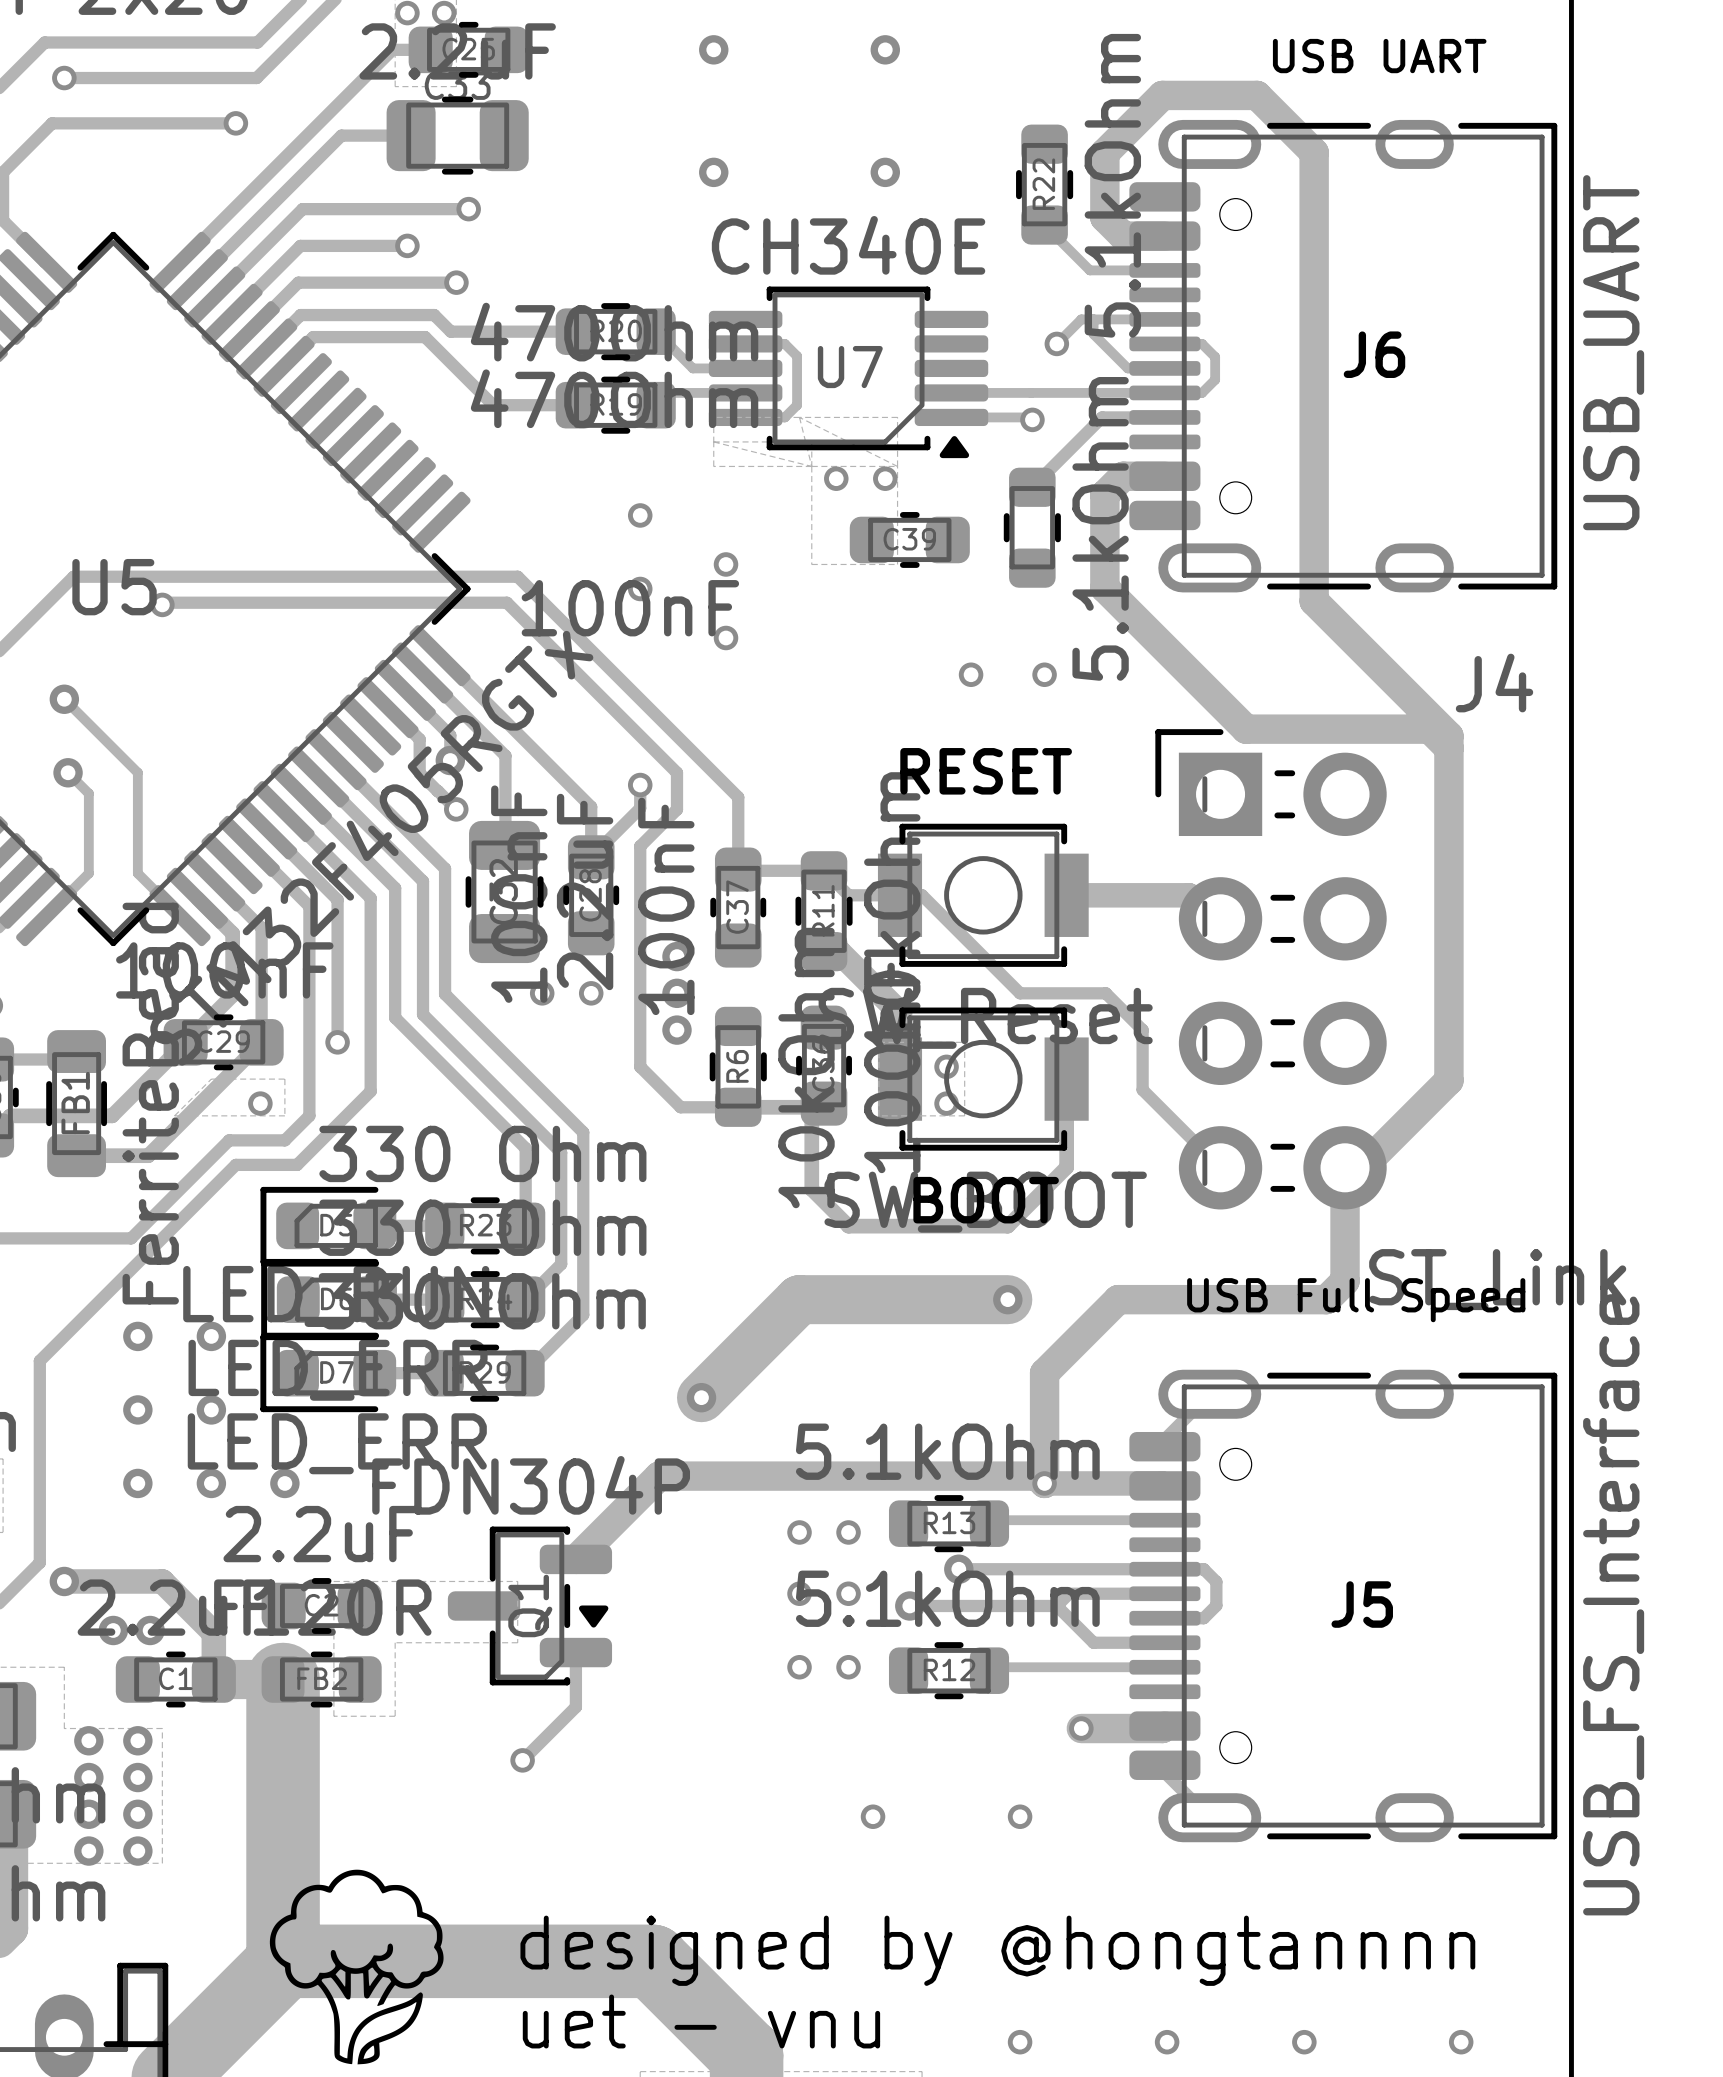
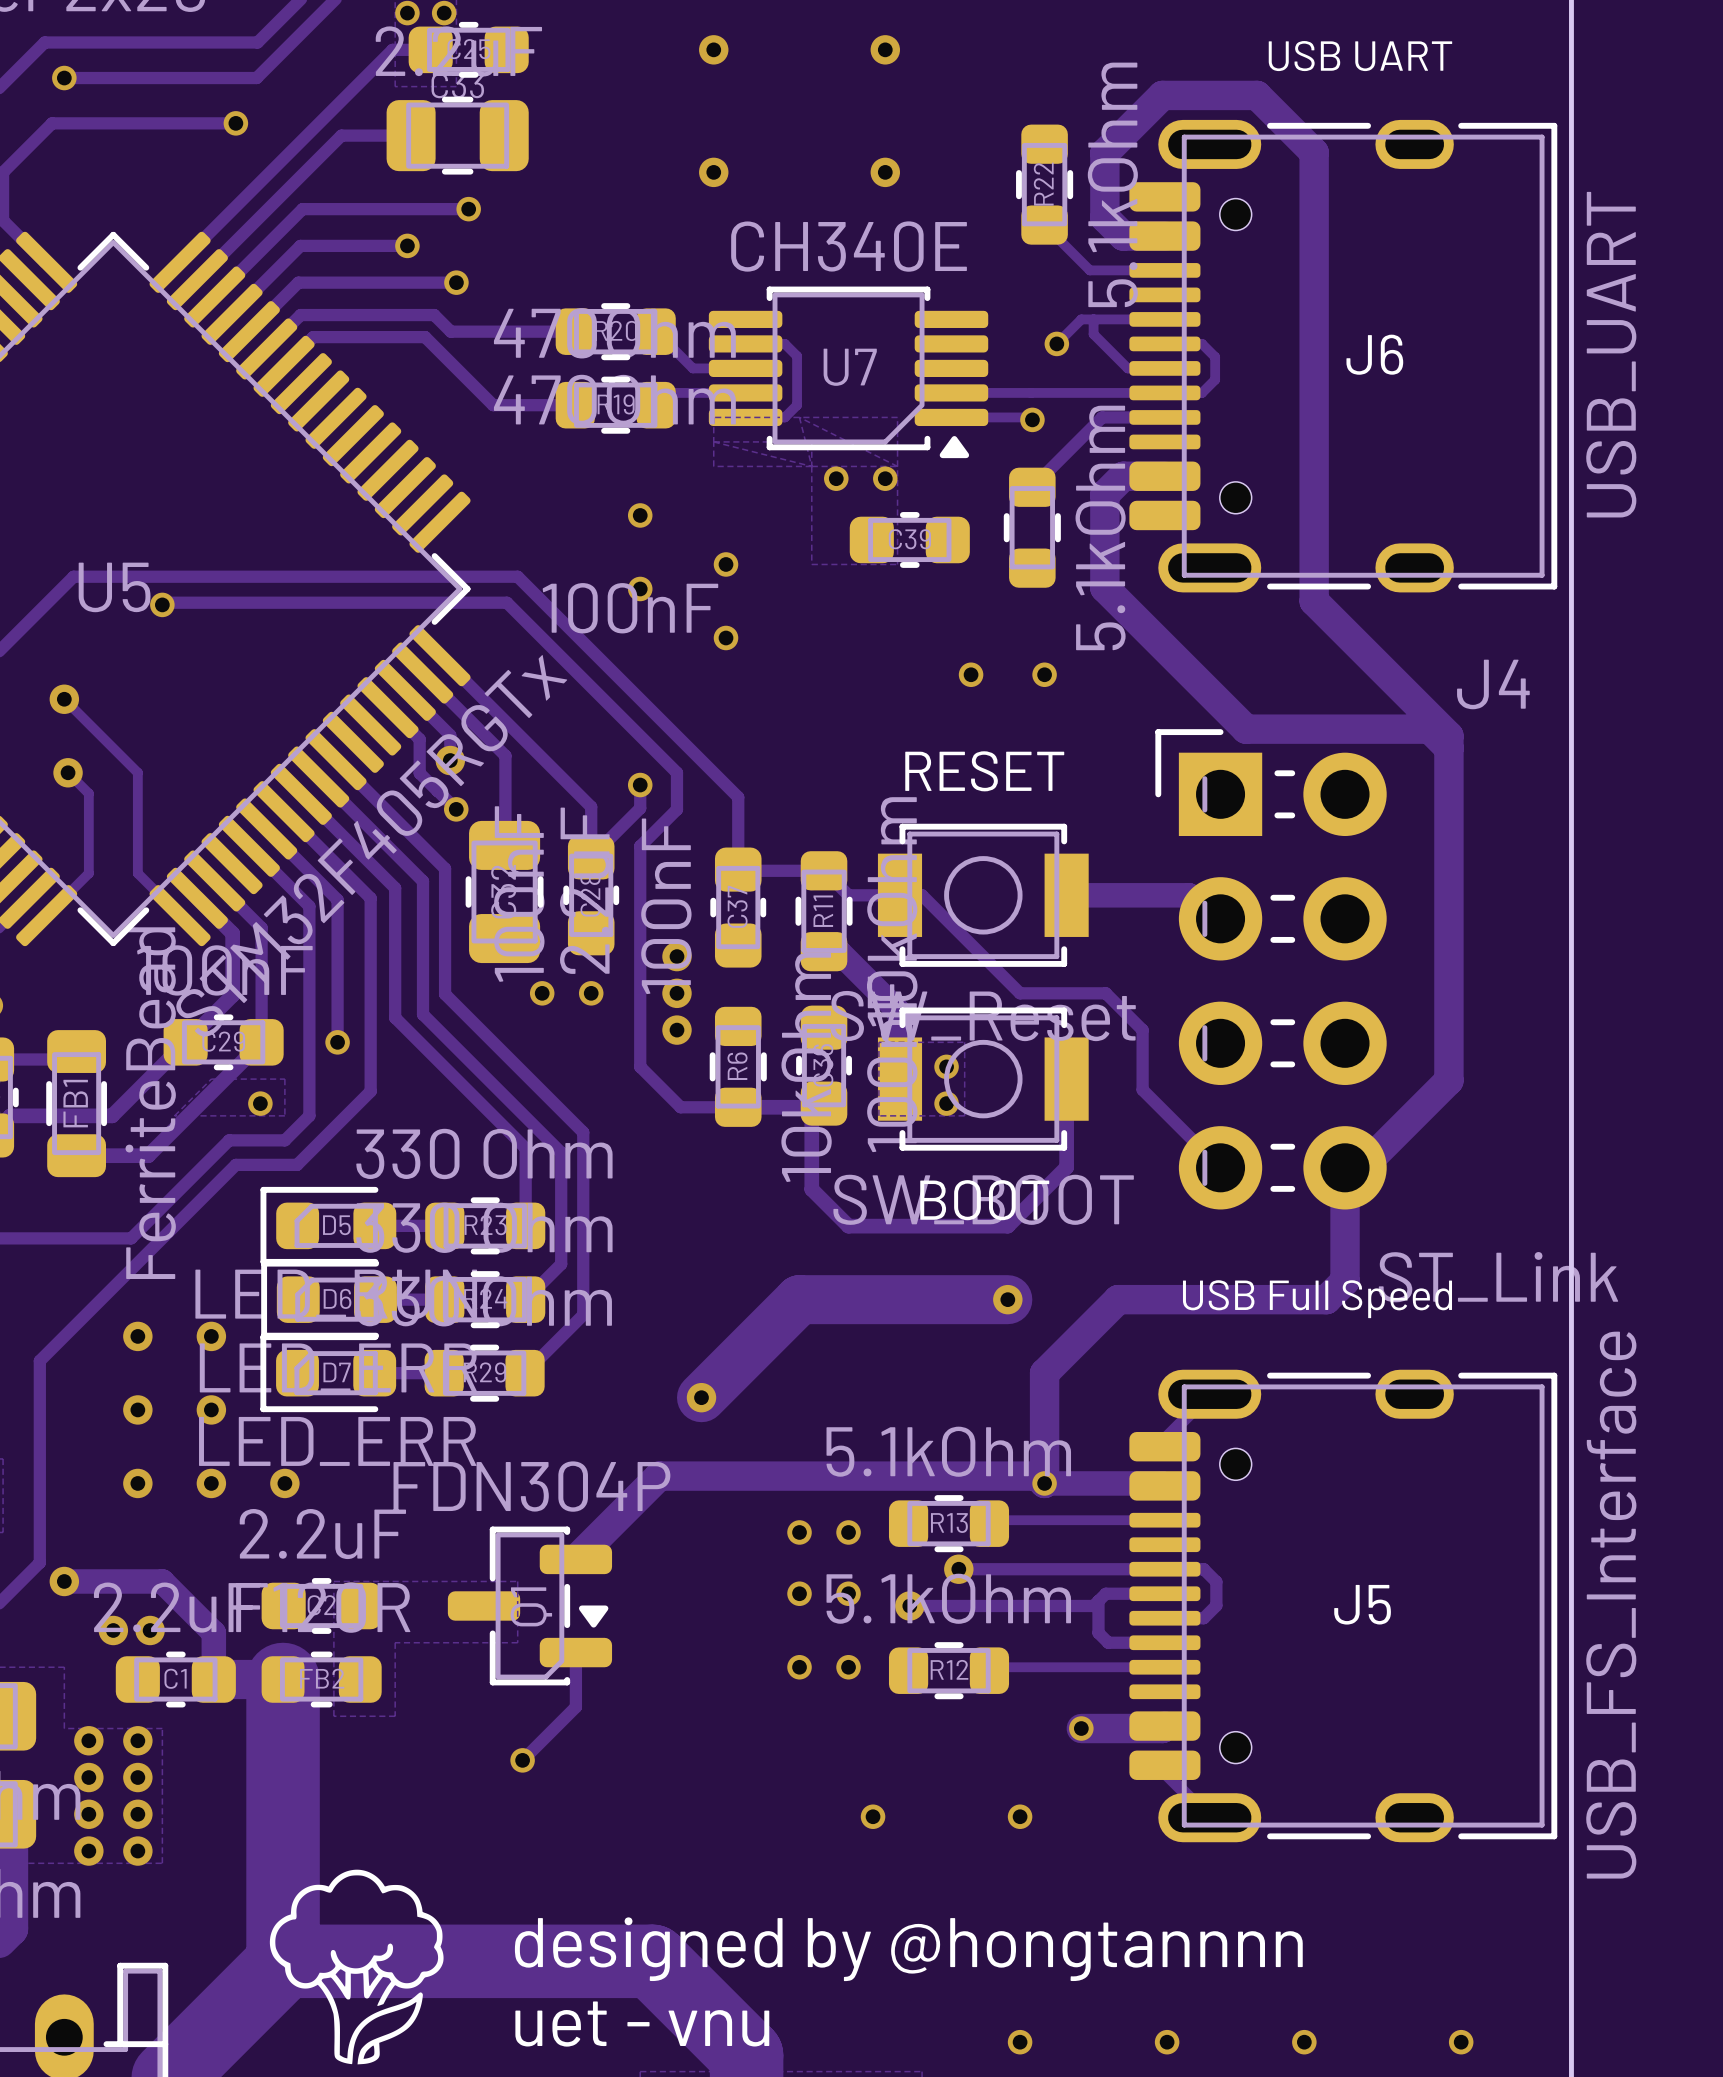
track: (1105, 1593) (1069, 1593) (1056, 1605) (1093, 1642) (1108, 1642) -> (1098, 1601) (1098, 1632) (1108, 1642)
track: none -> (1105, 1593) (1093, 1605) (1056, 1605)

